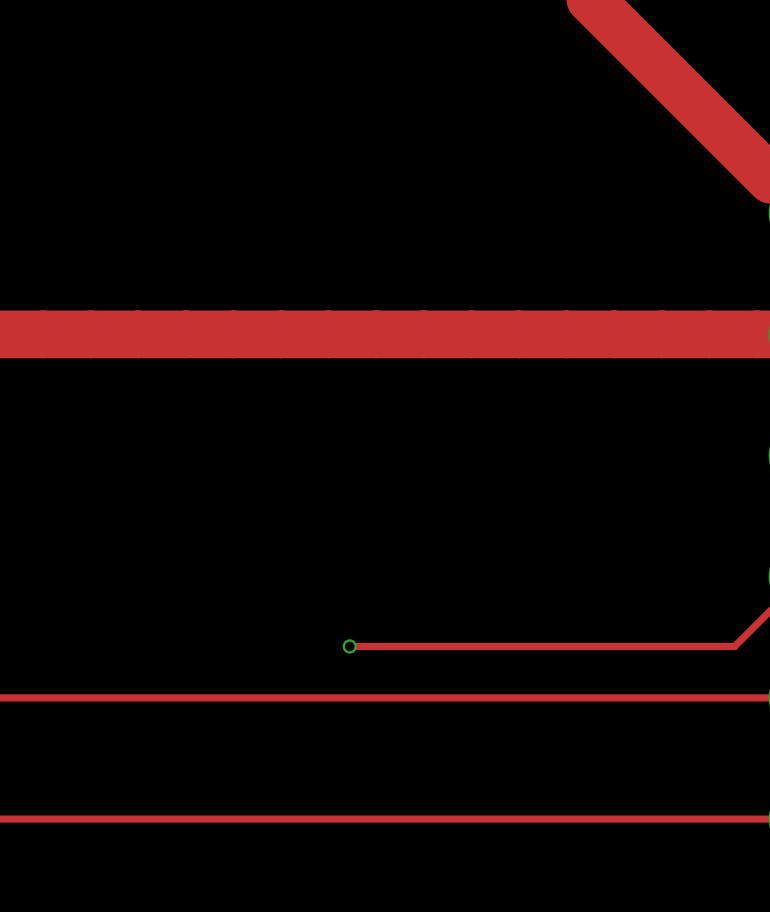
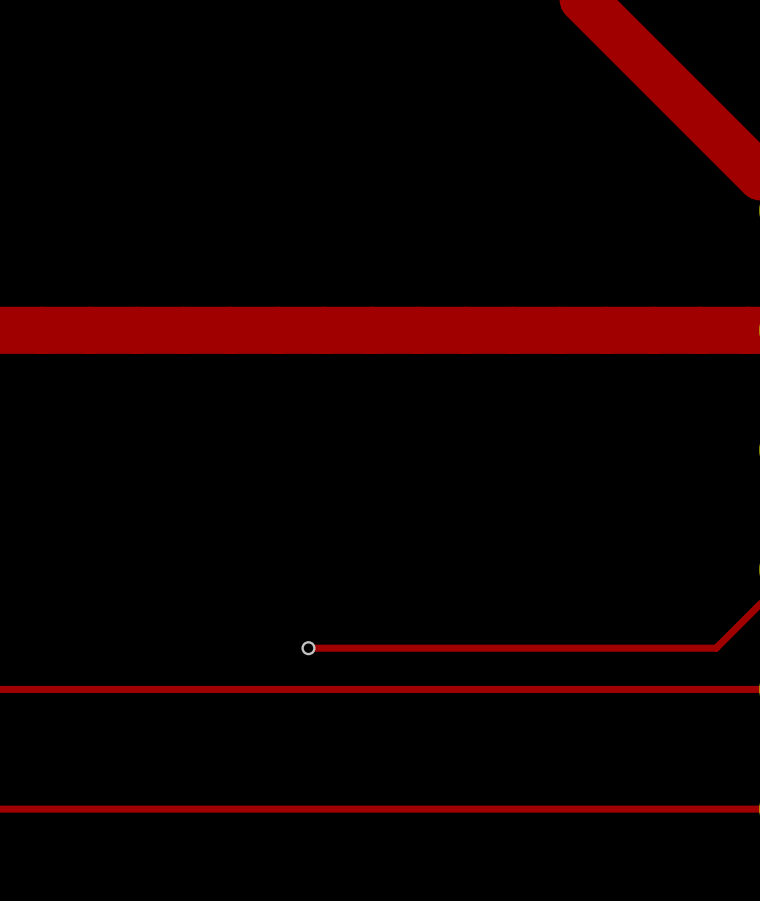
track: (349, 646) (734, 646) -> (308, 648) (716, 648) (725, 638)
via position: (349, 646) -> (308, 648)

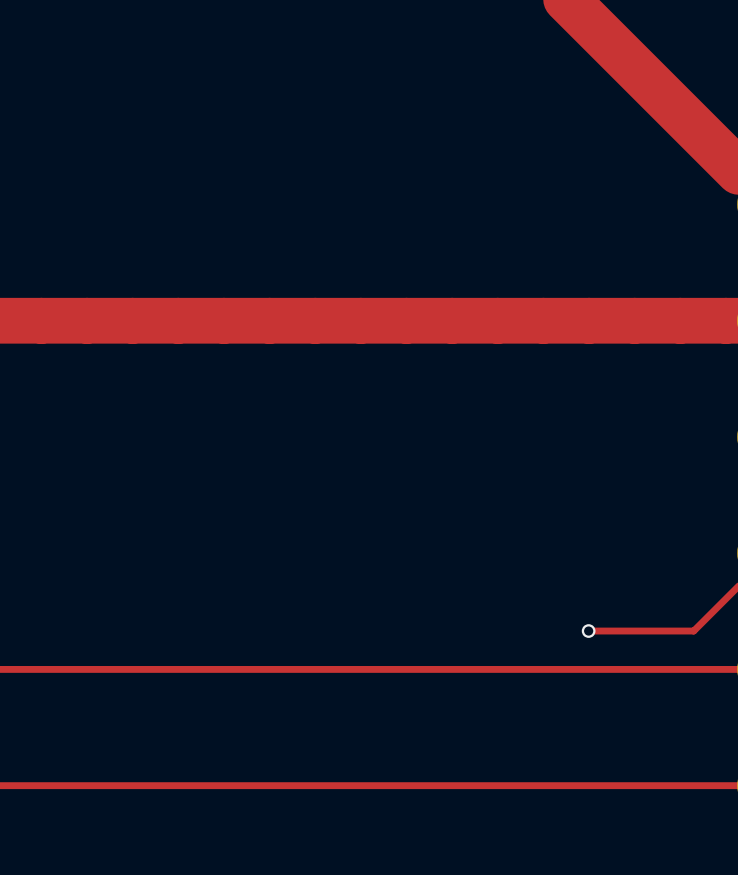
track: (308, 648) (716, 648) -> (588, 631) (693, 631) (695, 629)
via: (308, 648) -> none
via: none -> (588, 631)

